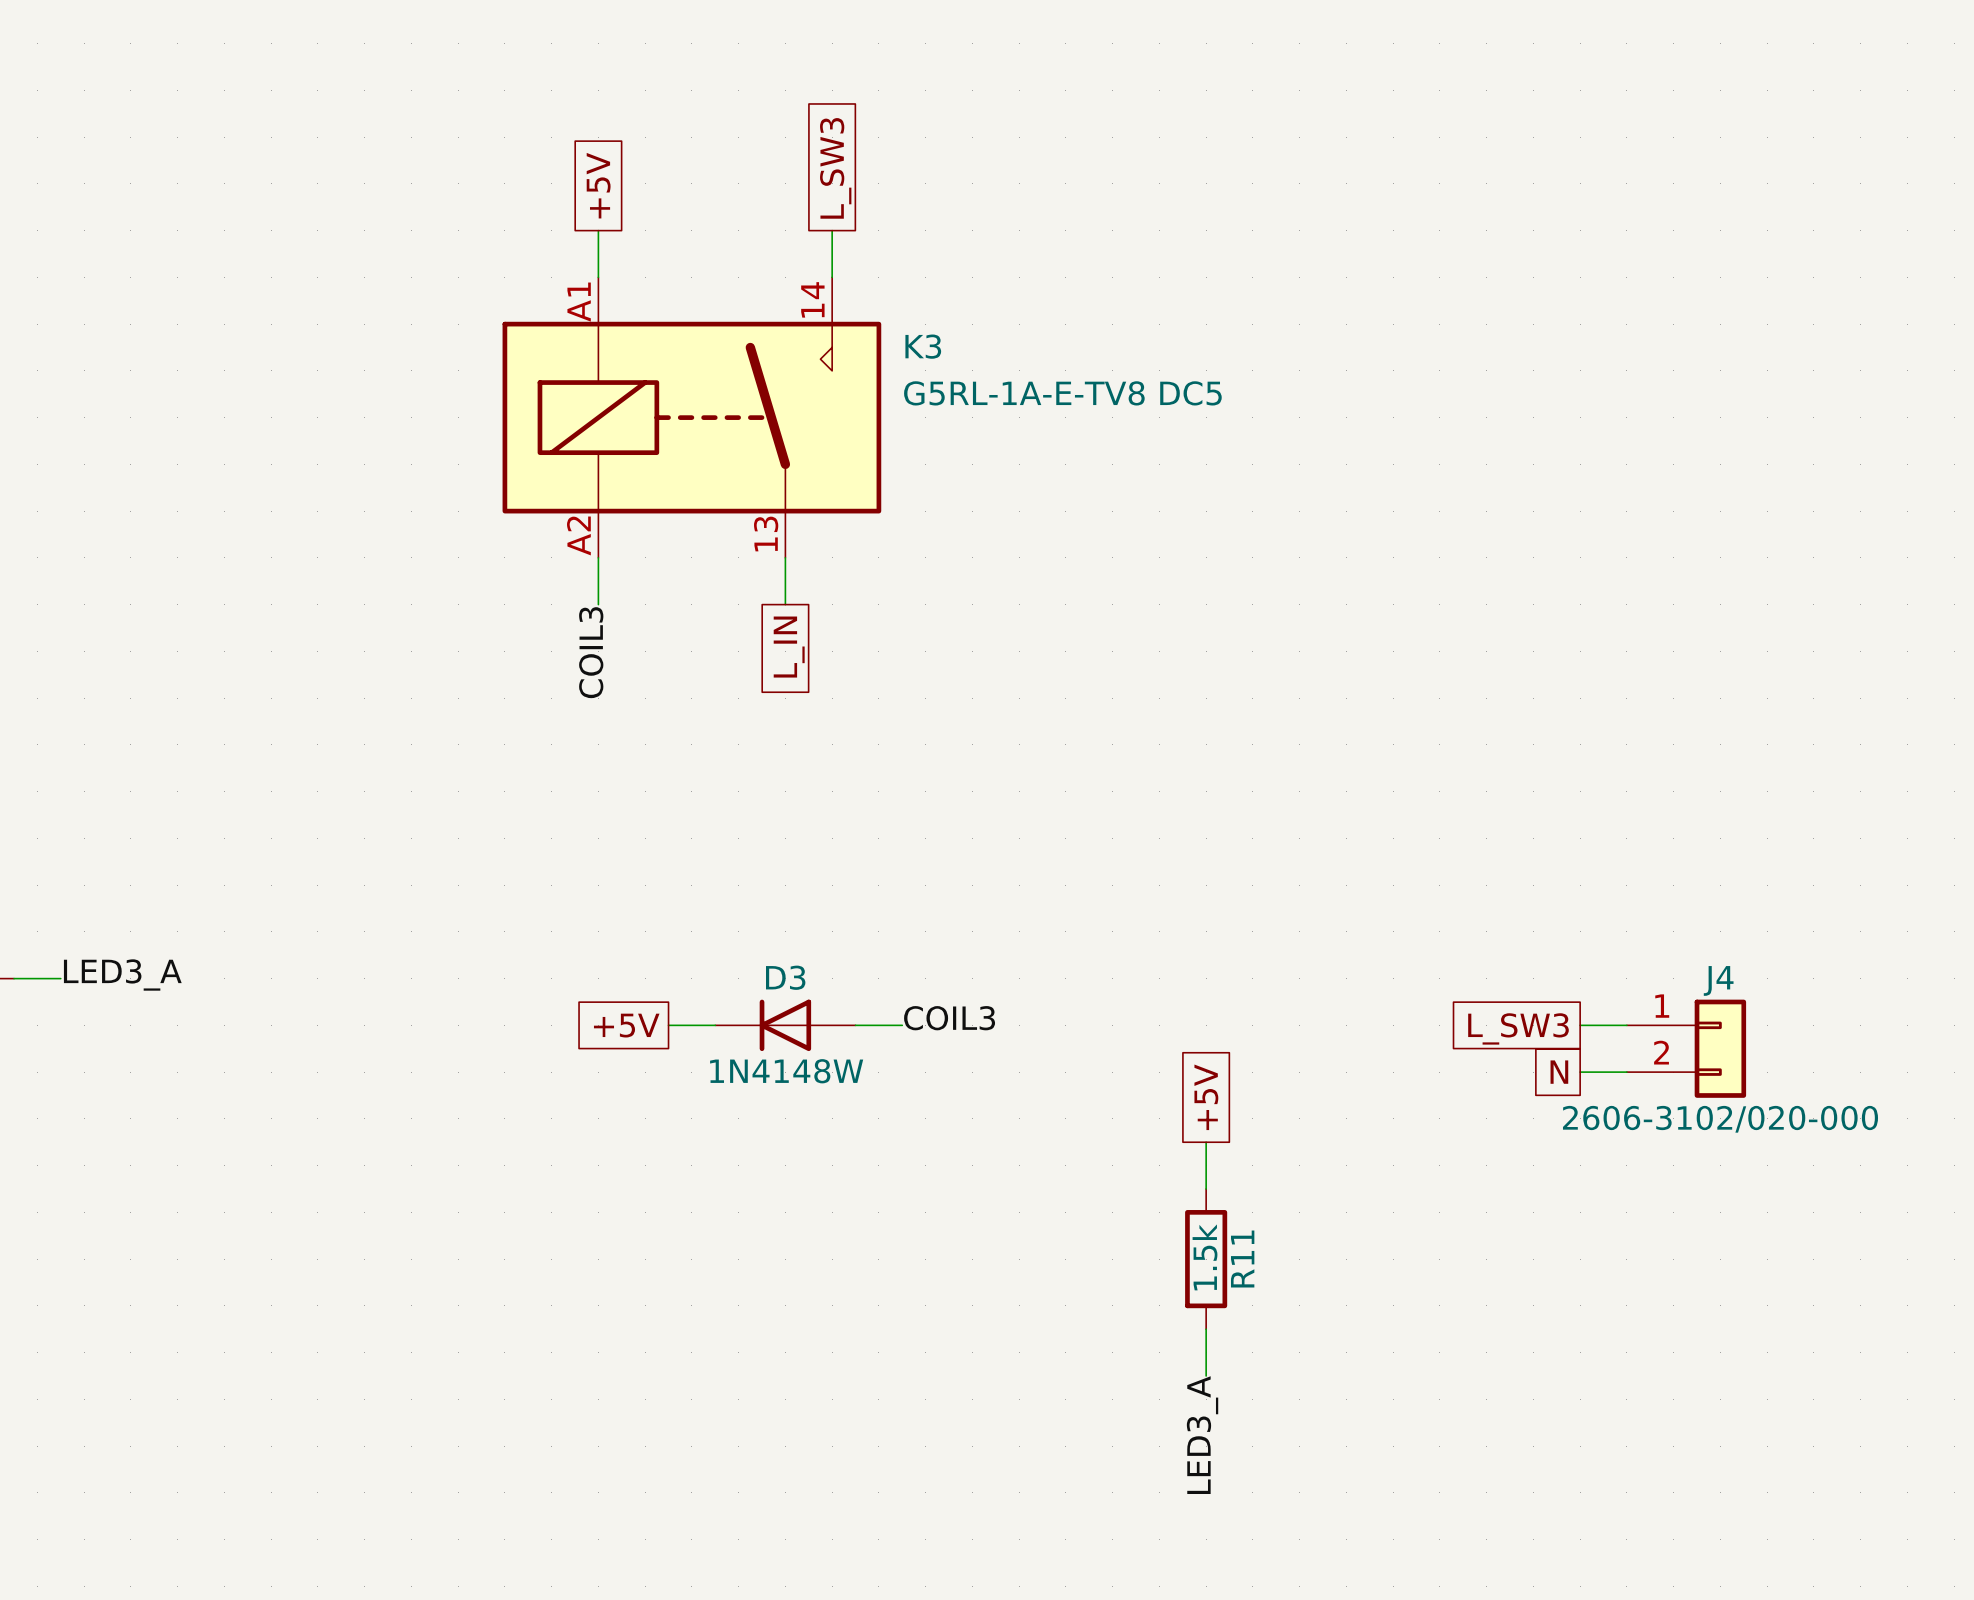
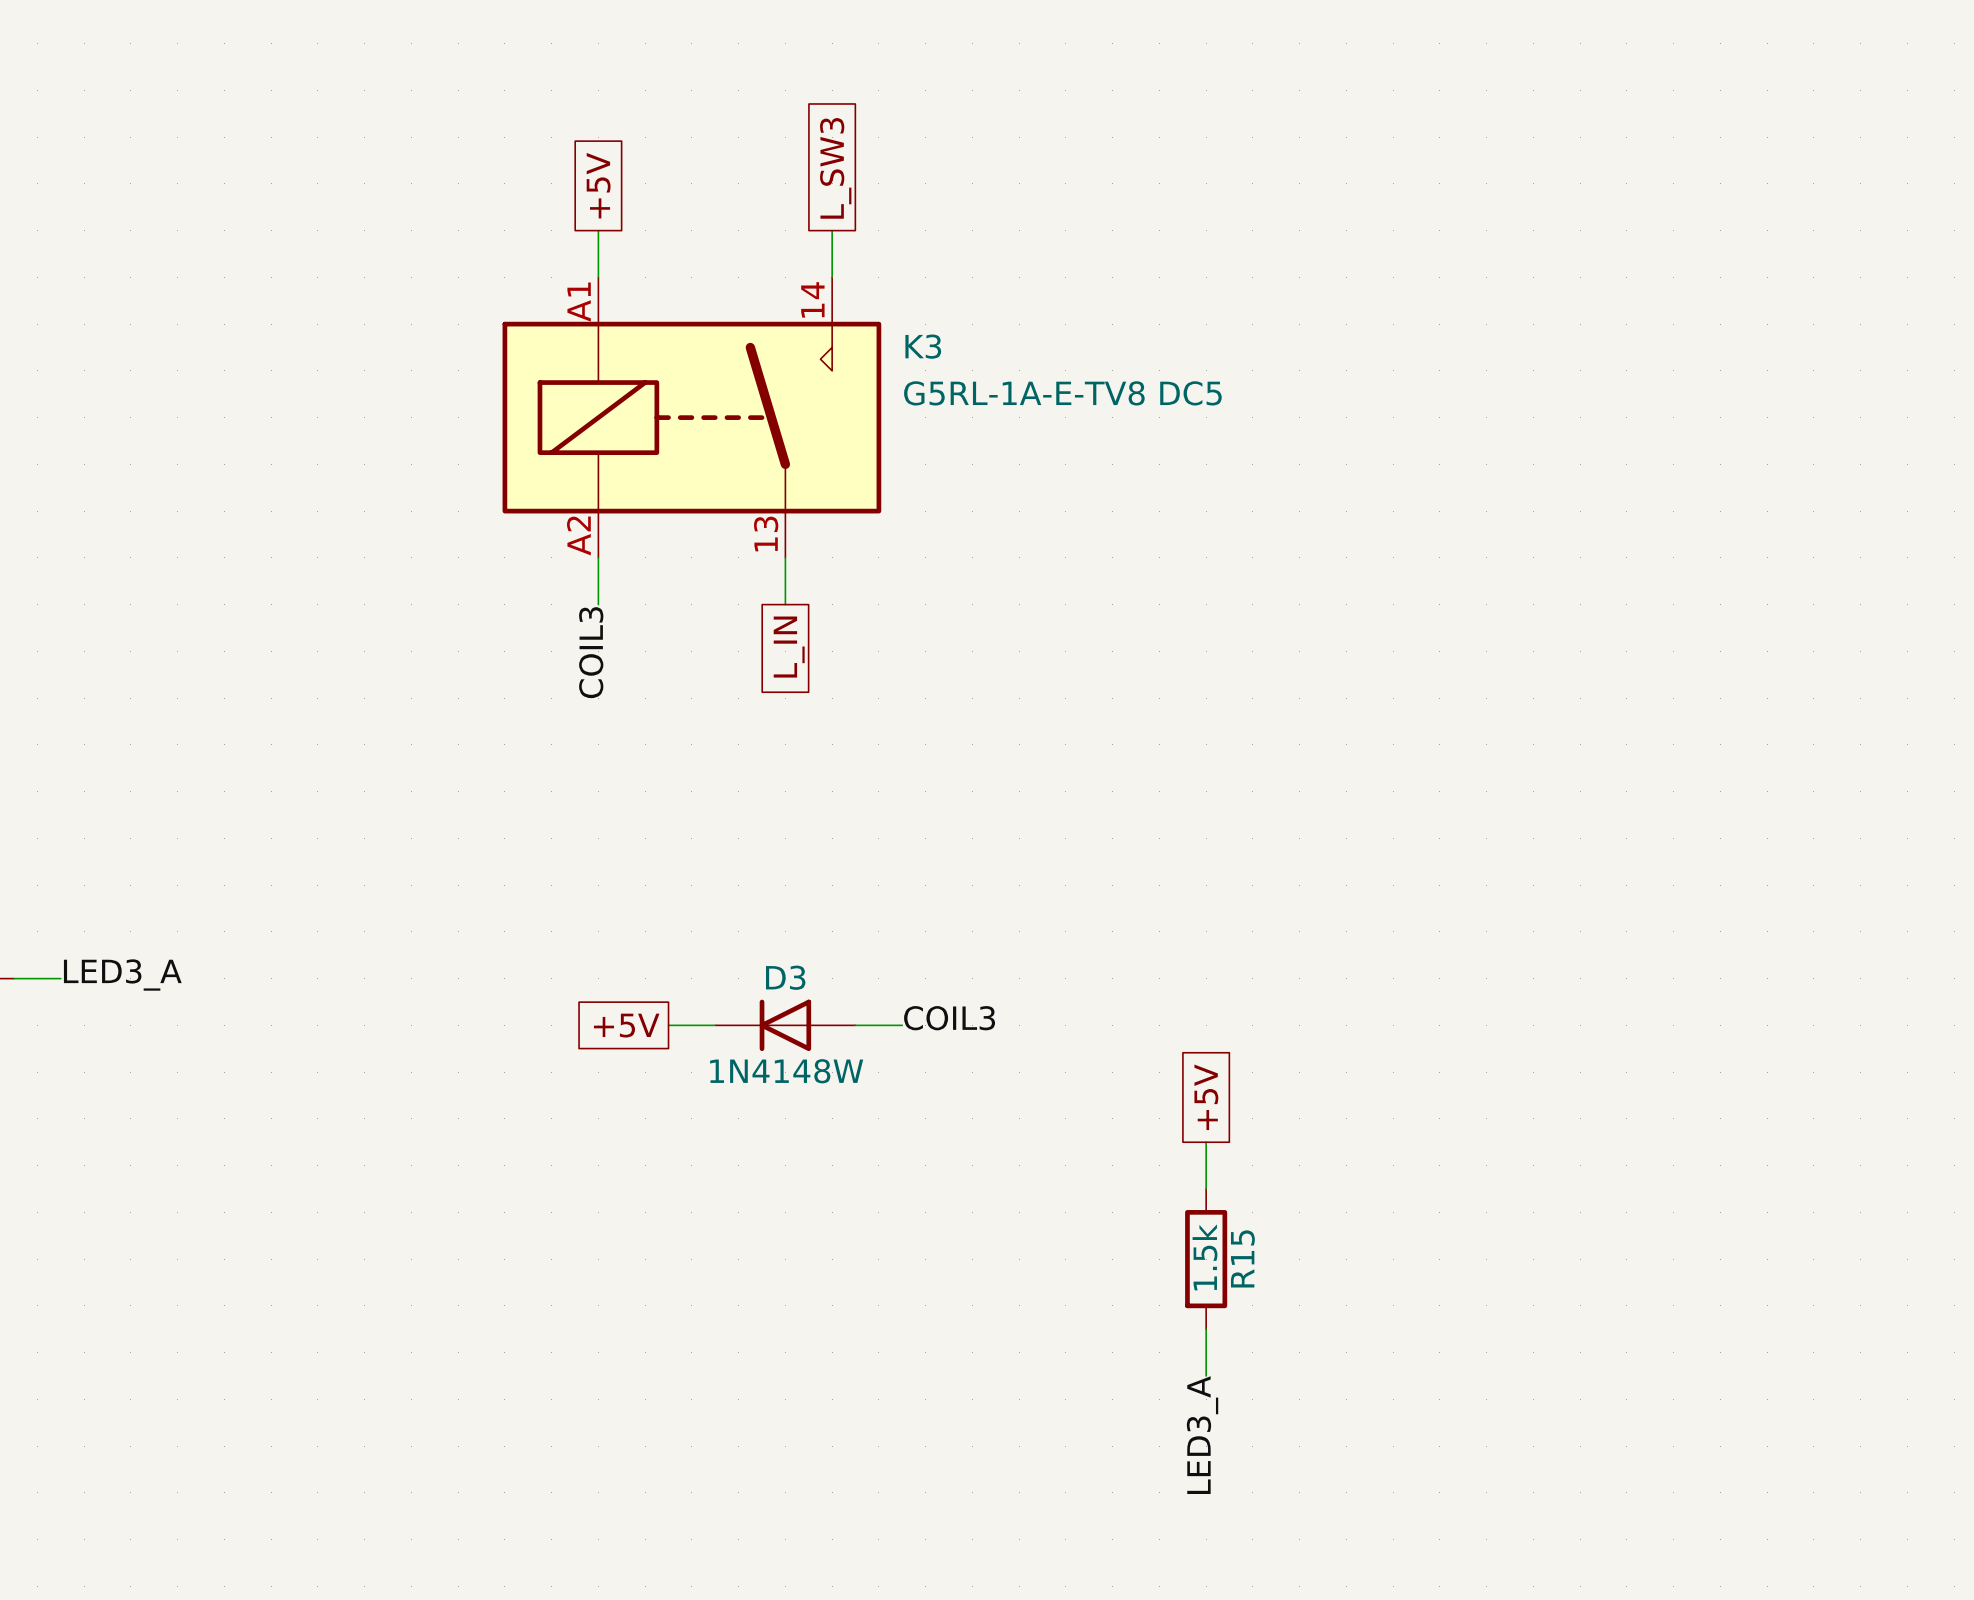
wire: (1580, 1025) (1626, 1025) -> none
global label: L_SW3 (1518, 1028) -> none
J4: 2606-3102/020-000 (1686, 1048) -> none
global label: N (1559, 1072) -> none
wire: (1580, 1072) (1626, 1072) -> none
R11 name: R11 (1242, 1259) -> R15 (1242, 1258)

